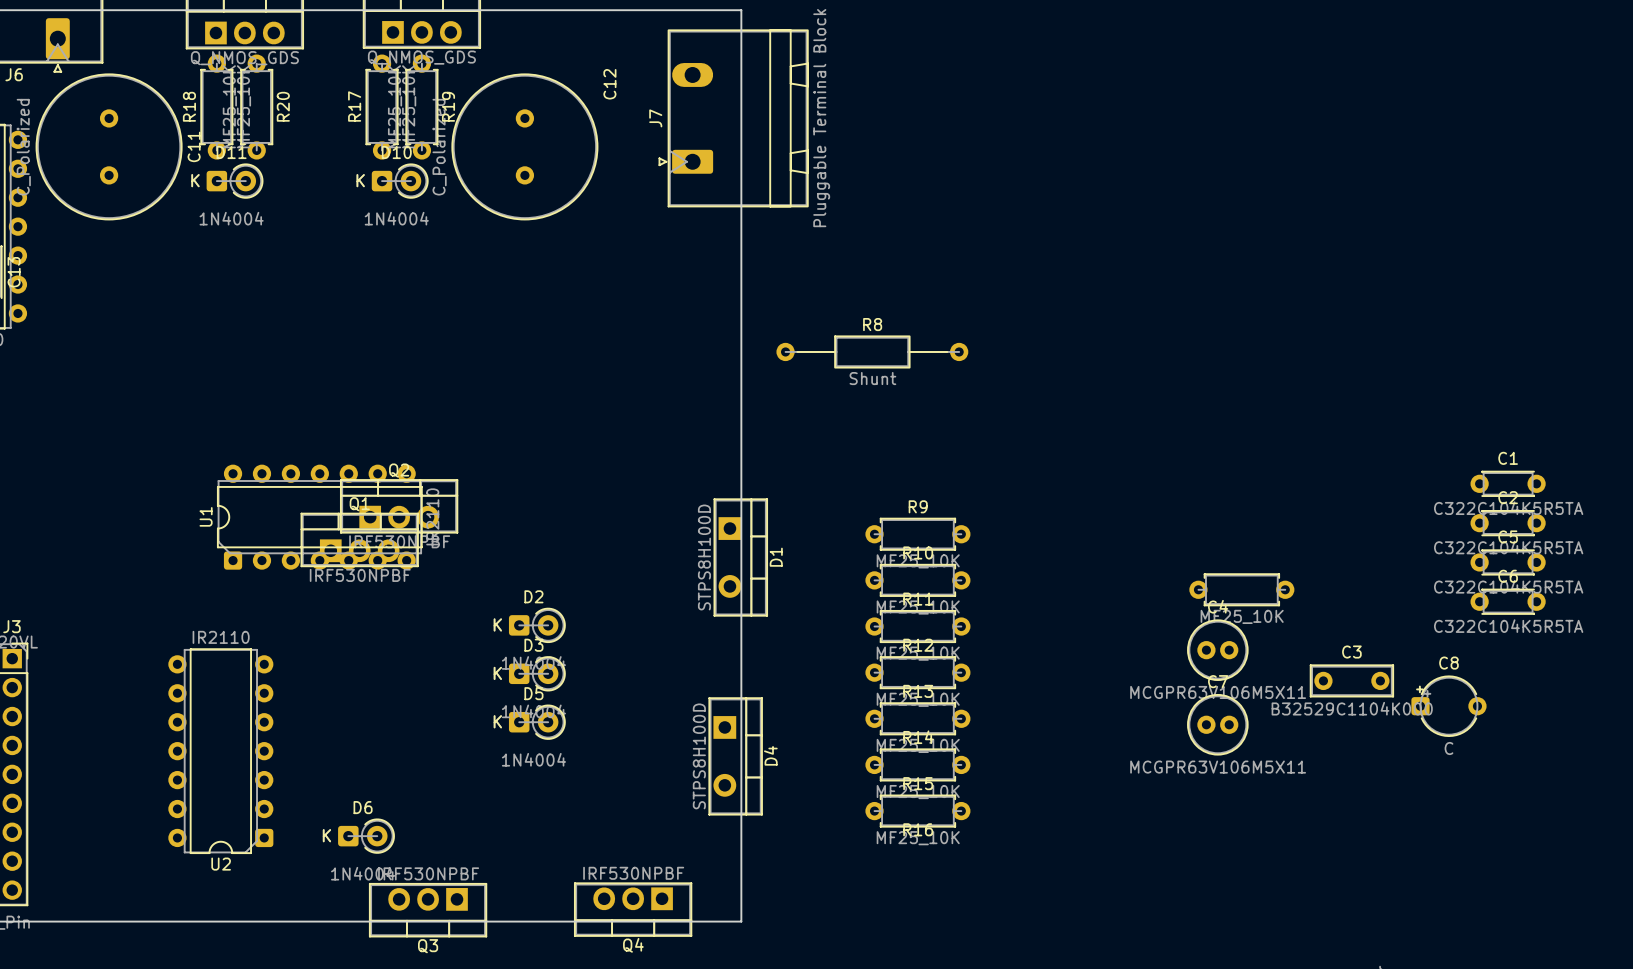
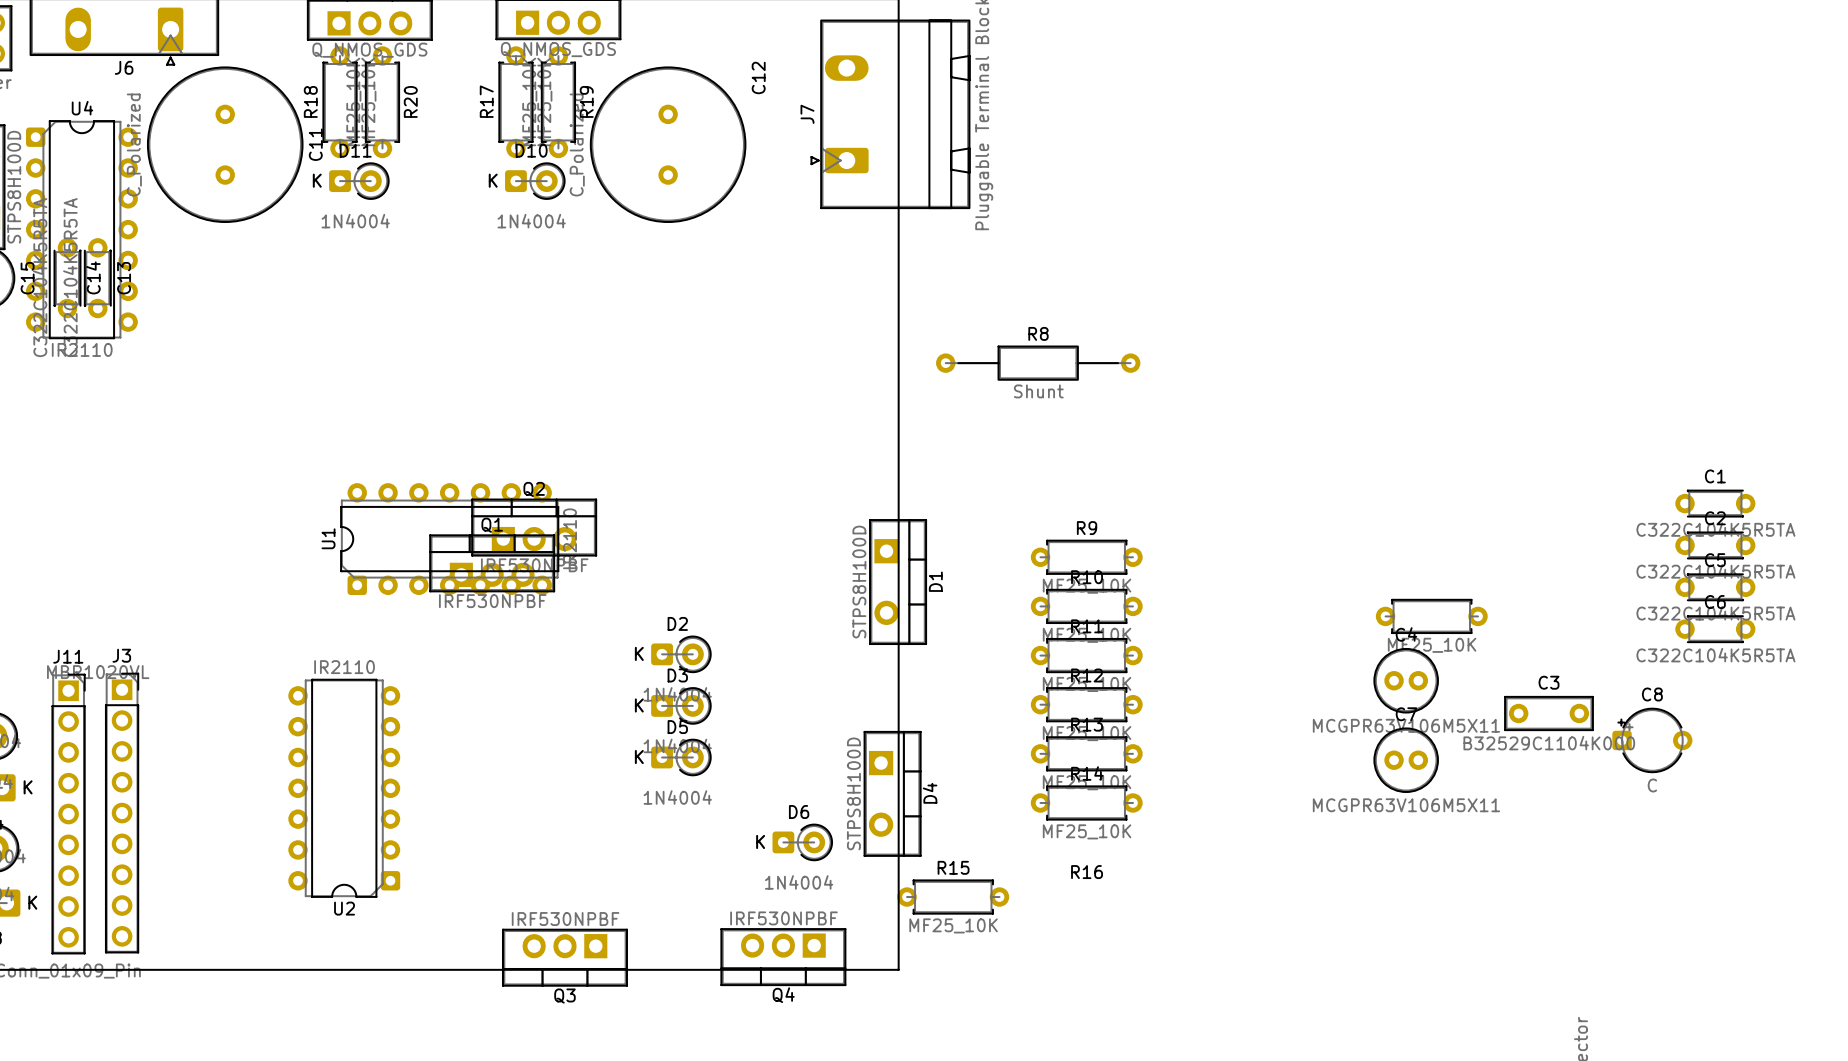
R15 position: (917, 811) -> (953, 897)
D6 position: (366, 836) -> (802, 842)

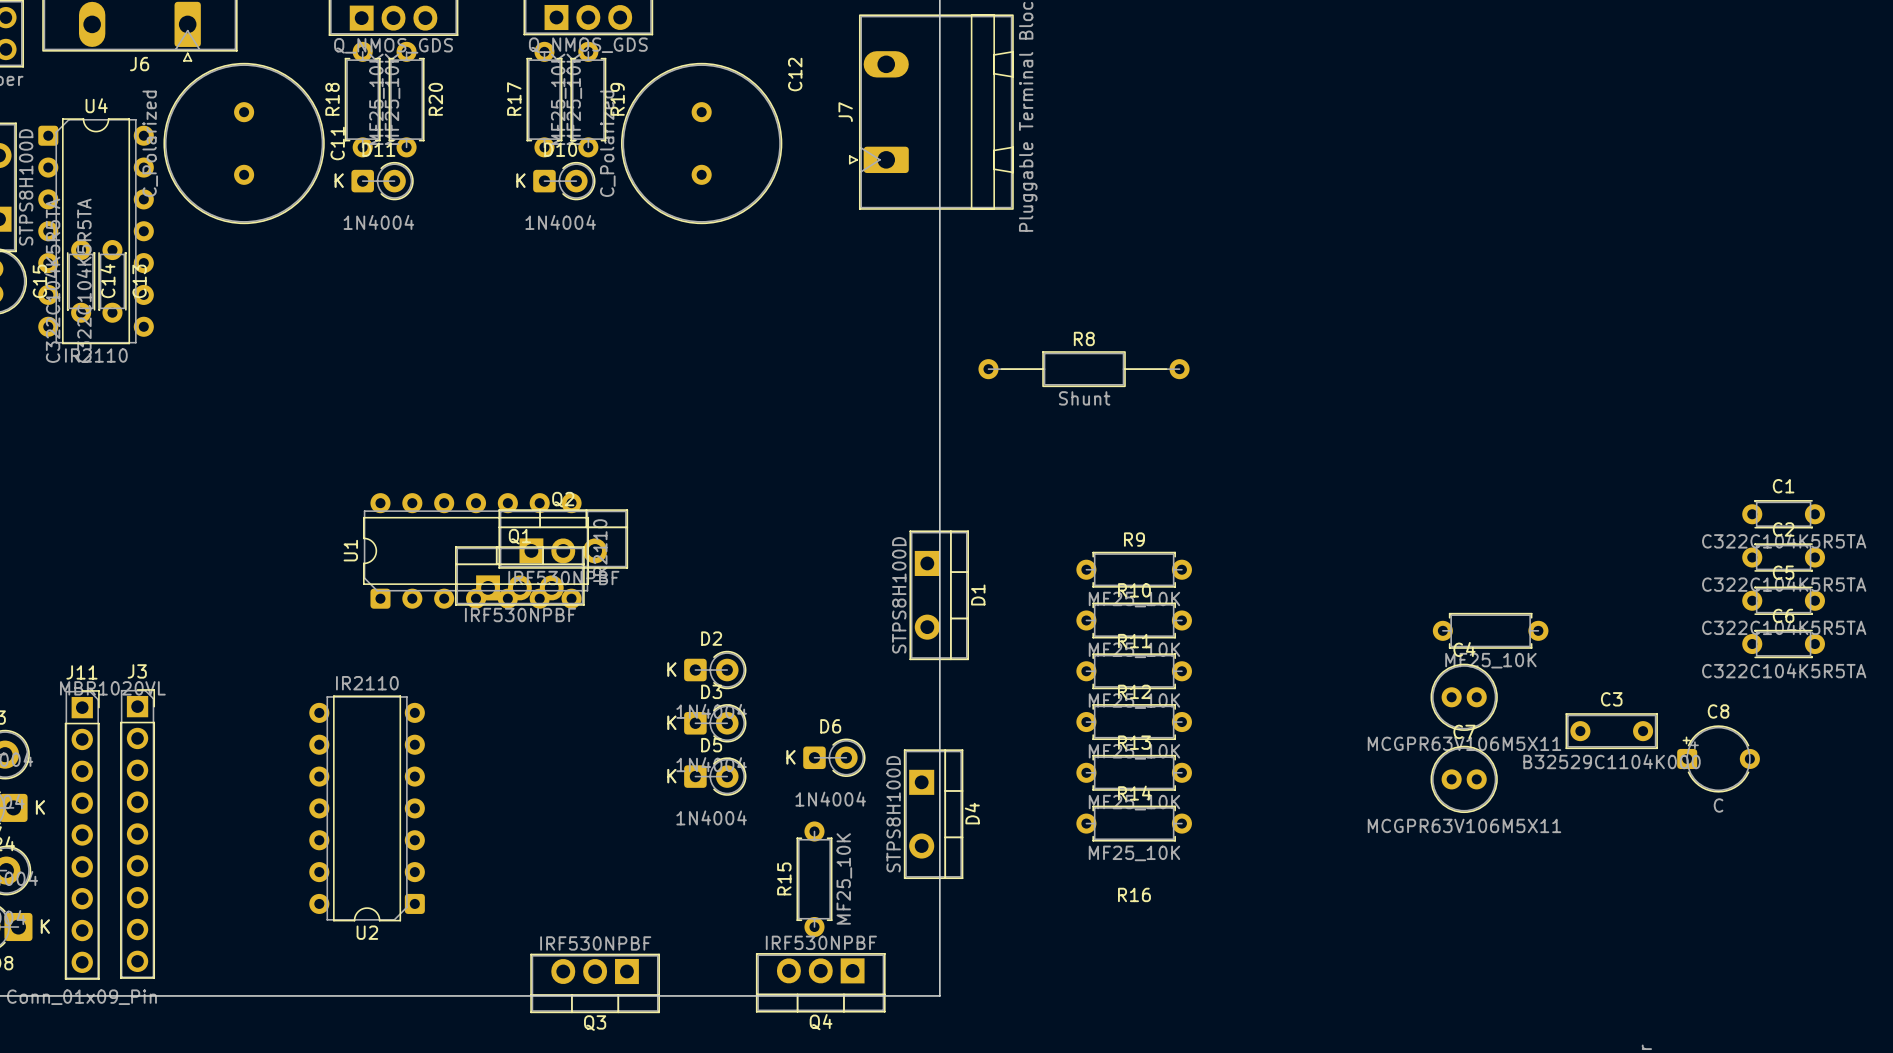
D6 position: (802, 842) -> (834, 757)
R15 name position: R15 (953, 867) -> R15 (784, 878)
R15 rotation: 0° (953, 897) -> 90° clockwise (814, 879)
R15 position: (953, 897) -> (814, 879)
R15 value position: MF25_10K (953, 925) -> MF25_10K (844, 878)

